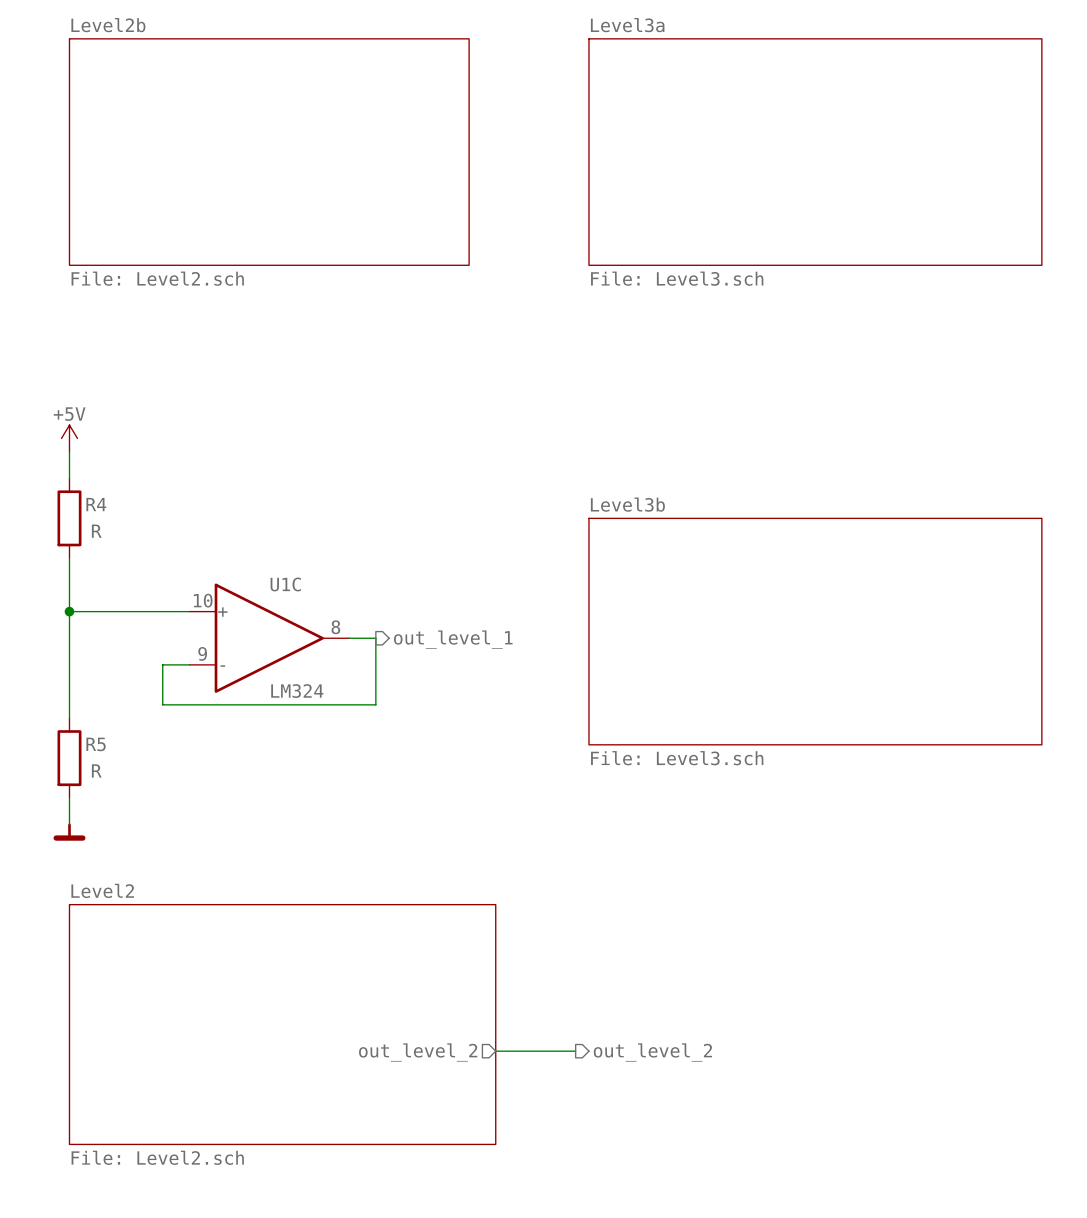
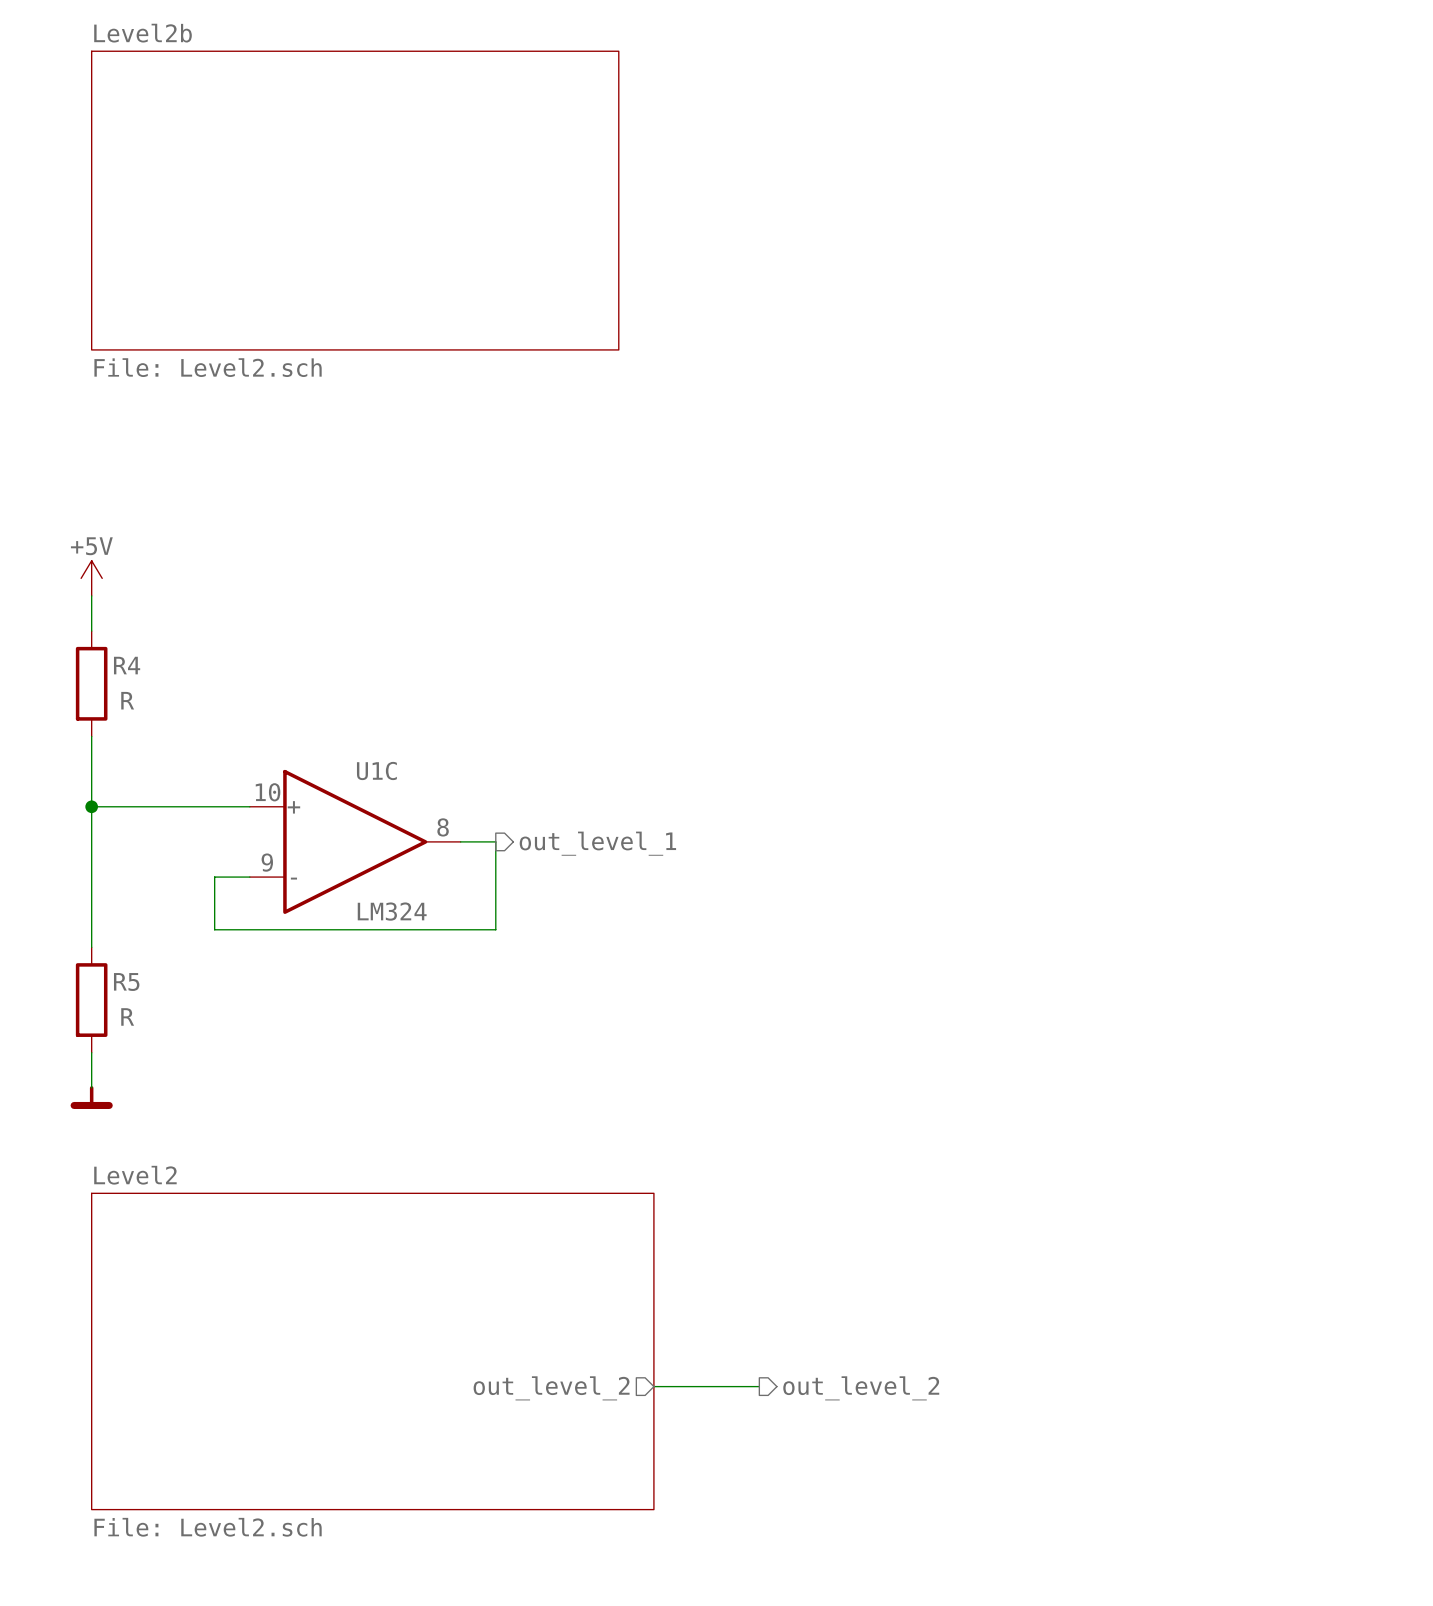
sheet Level3a: File: Level3.sch (815, 152) -> none
sheet Level3b: File: Level3.sch (815, 631) -> none

